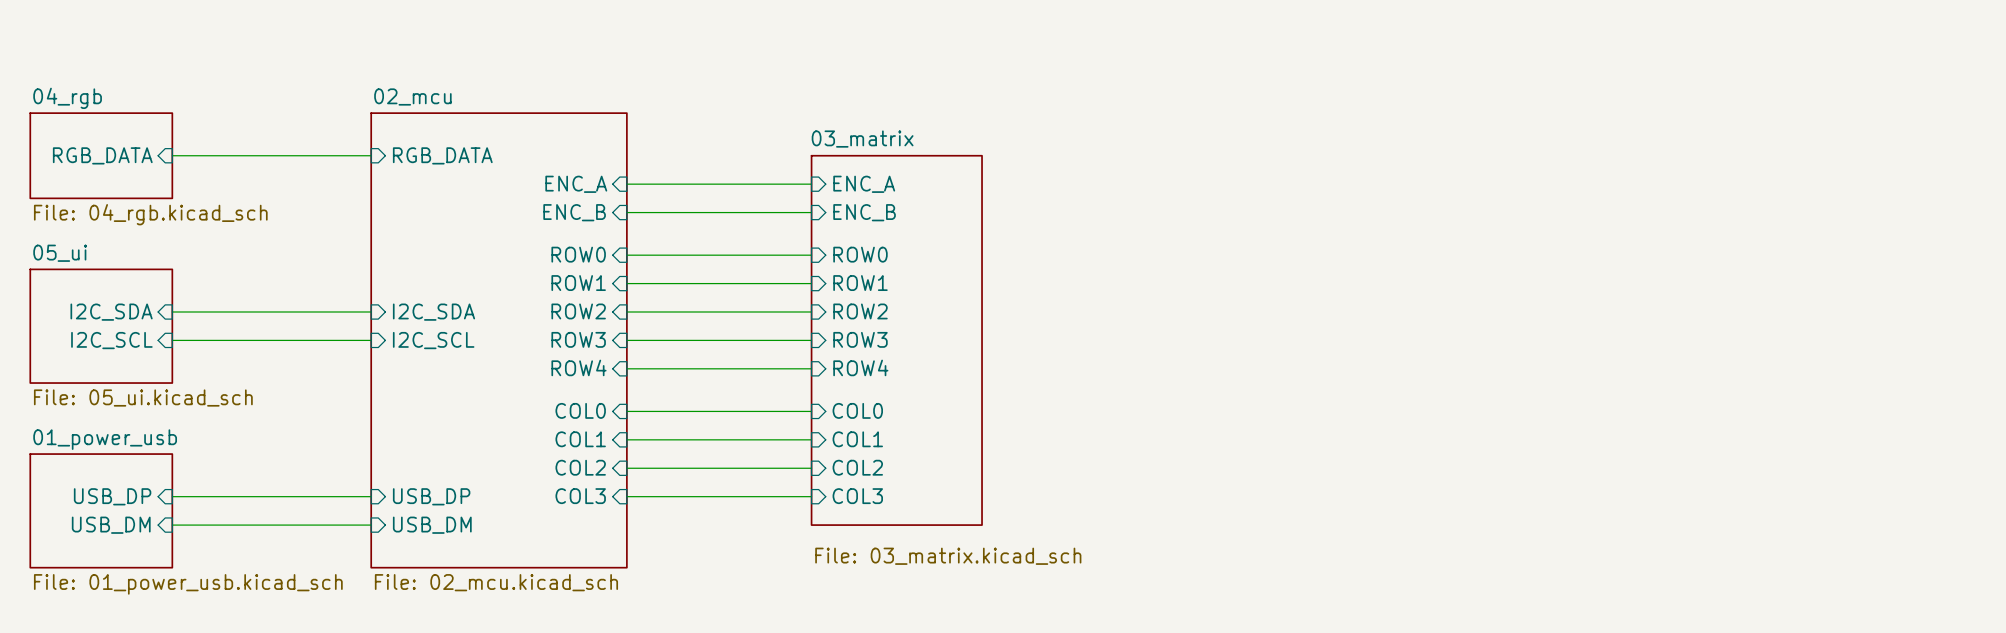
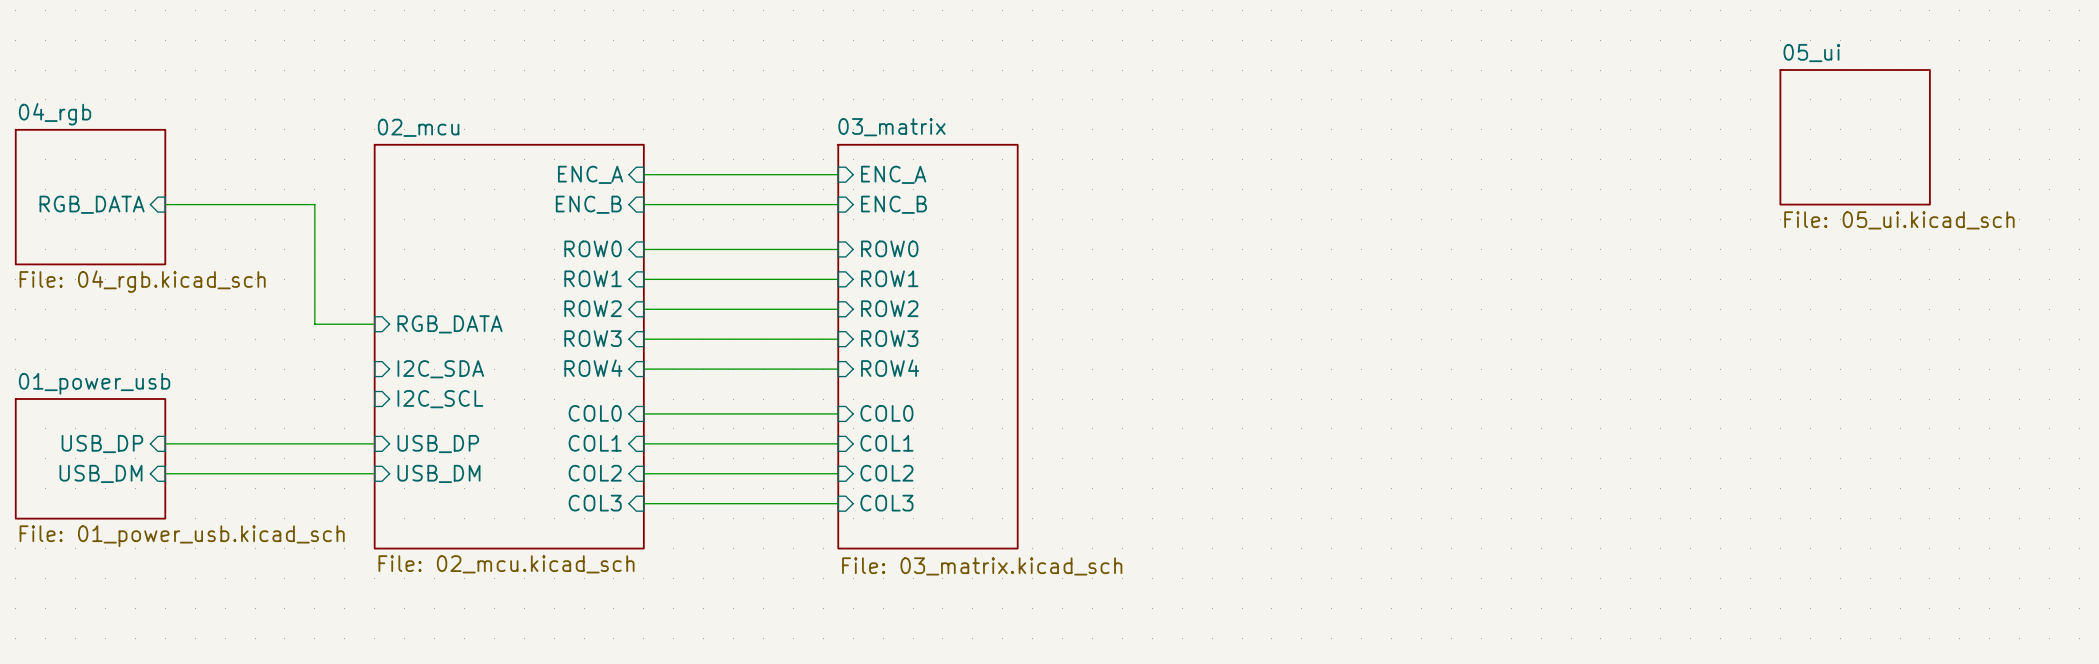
sheet 02_mcu name position: 02_mcu (412, 97) -> 02_mcu (418, 127)
sheet 04_rgb shape: [29, 112, 174, 200] -> [14, 128, 167, 266]
sheet 02_mcu shape: [370, 112, 628, 569] -> [373, 143, 645, 550]
sheet 03_matrix shape: [810, 154, 983, 526] -> [837, 143, 1019, 550]
sheet pin position: RGB_DATA (102, 155) -> RGB_DATA (92, 204)
wire: (172, 155) (371, 155) -> none
sheet pin: RGB_DATA (442, 155) -> none
sheet pin: none -> ENC_A (590, 174)
wire: none -> (643, 174) (838, 174)
sheet pin: none -> ENC_A (893, 174)
wire: none -> (165, 204) (314, 204) (314, 324) (374, 324)
sheet pin: ENC_A (576, 184) -> ENC_B (588, 204)
sheet pin: ENC_A (864, 184) -> ENC_B (894, 204)
sheet pin: ENC_B (574, 212) -> none
wire: (626, 212) (811, 212) -> (643, 249) (838, 249)
sheet pin: ENC_B (864, 212) -> none
sheet pin: none -> ROW0 (593, 248)
sheet pin: none -> ROW0 (889, 248)
sheet pin: ROW0 (578, 254) -> ROW1 (593, 278)
sheet pin: ROW0 (860, 254) -> ROW1 (889, 278)
sheet 05_ui shape: [29, 268, 174, 384] -> [1779, 69, 1931, 206]
sheet pin: ROW1 (578, 283) -> ROW2 (593, 308)
sheet pin: ROW1 (860, 283) -> ROW2 (889, 308)
sheet pin: none -> RGB_DATA (450, 324)
wire: (172, 311) (371, 311) -> (165, 443) (374, 443)
sheet pin: ROW2 (578, 311) -> ROW3 (593, 338)
sheet pin: ROW2 (860, 311) -> ROW3 (889, 338)
sheet pin: I2C_SDA (111, 312) -> none
sheet pin: I2C_SDA (433, 312) -> none
sheet pin: ROW3 (578, 339) -> ROW4 (593, 368)
sheet pin: ROW3 (860, 339) -> ROW4 (890, 368)
sheet pin rotation: 0° (111, 340) -> 180° (440, 399)
sheet pin position: I2C_SCL (111, 340) -> I2C_SCL (440, 399)
wire: (172, 340) (371, 340) -> none
sheet pin: I2C_SCL (433, 340) -> I2C_SDA (440, 369)
sheet pin: ROW4 (578, 367) -> none
sheet pin: ROW4 (860, 367) -> none
wire: (626, 368) (811, 368) -> (643, 413) (838, 413)
sheet pin: none -> COL0 (595, 413)
sheet pin: none -> COL0 (886, 413)
sheet pin: COL0 (580, 410) -> COL1 (595, 443)
sheet pin: COL0 (857, 410) -> COL1 (886, 443)
sheet pin: COL1 (580, 439) -> COL2 (595, 473)
sheet pin: COL1 (857, 439) -> COL2 (886, 473)
sheet pin: COL2 (580, 467) -> COL3 (595, 503)
sheet pin: COL2 (857, 467) -> COL3 (886, 503)
sheet pin position: USB_DP (112, 496) -> USB_DP (102, 444)
wire: (172, 496) (371, 496) -> (165, 473) (374, 473)
sheet pin position: USB_DP (431, 496) -> USB_DP (438, 444)
sheet pin: COL3 (580, 496) -> none
wire: (626, 496) (811, 496) -> none
sheet pin: COL3 (857, 496) -> none
sheet 01_power_usb position: (101, 510) -> (90, 458)
sheet pin position: USB_DM (111, 525) -> USB_DM (100, 473)
wire: (172, 525) (371, 525) -> none
sheet pin position: USB_DM (432, 525) -> USB_DM (438, 473)
sheet 02_mcu value position: File: 02_mcu.kicad_sch (496, 582) -> File: 02_mcu.kicad_sch (506, 564)

